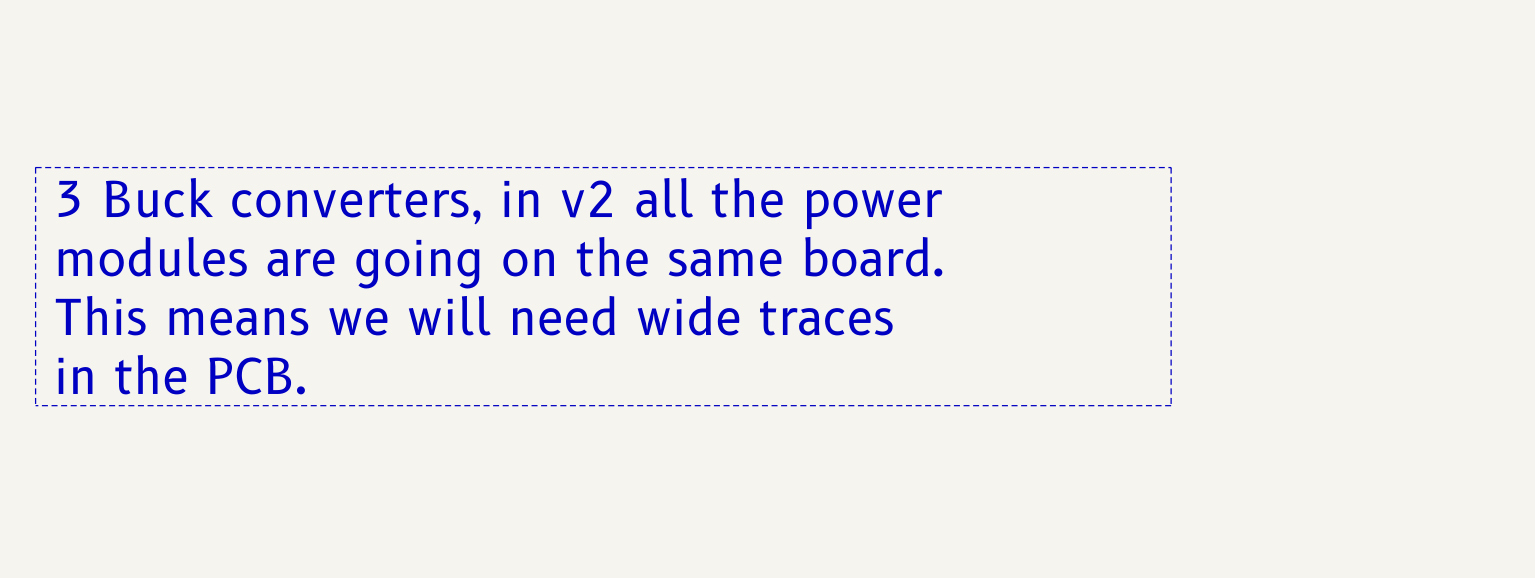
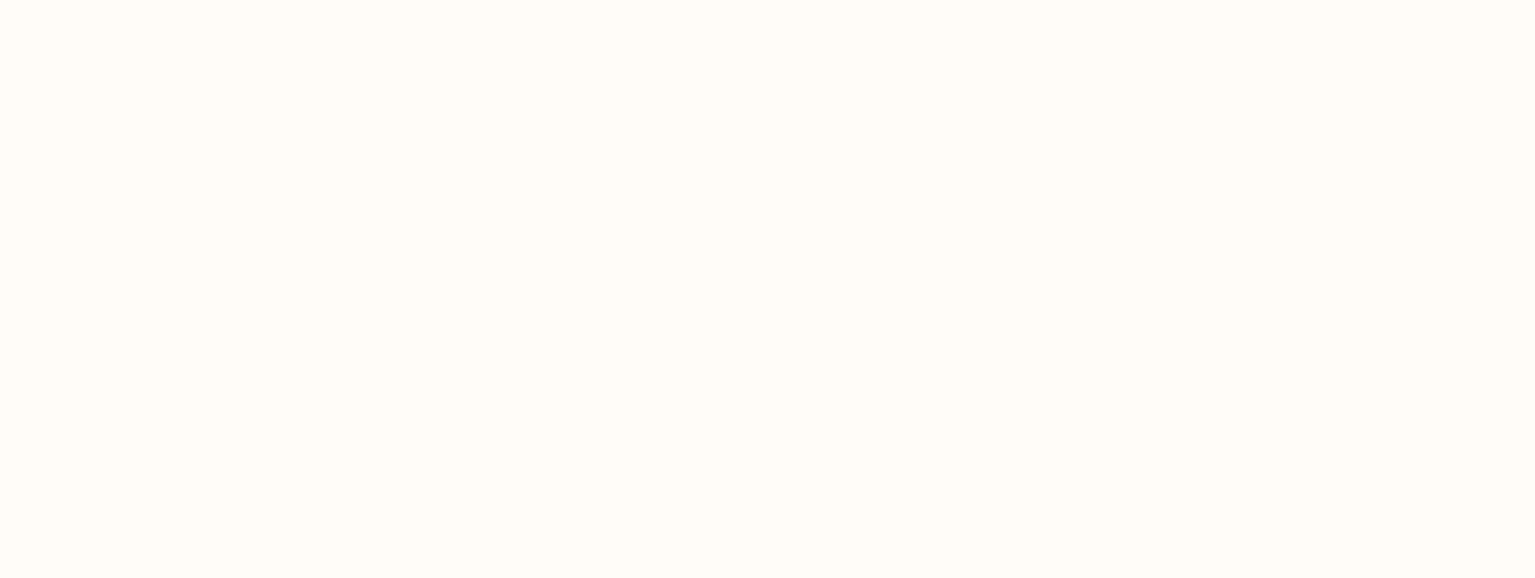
line: (35, 167) (1171, 167) (1171, 405) (35, 405) (35, 167) -> none
text: 3 Buck converters, in v2 all the power (500, 203) -> none
text: modules are going on the same board. (500, 262) -> none
text: This means we will need wide traces (474, 315) -> none
text: in the PCB. (181, 374) -> none

